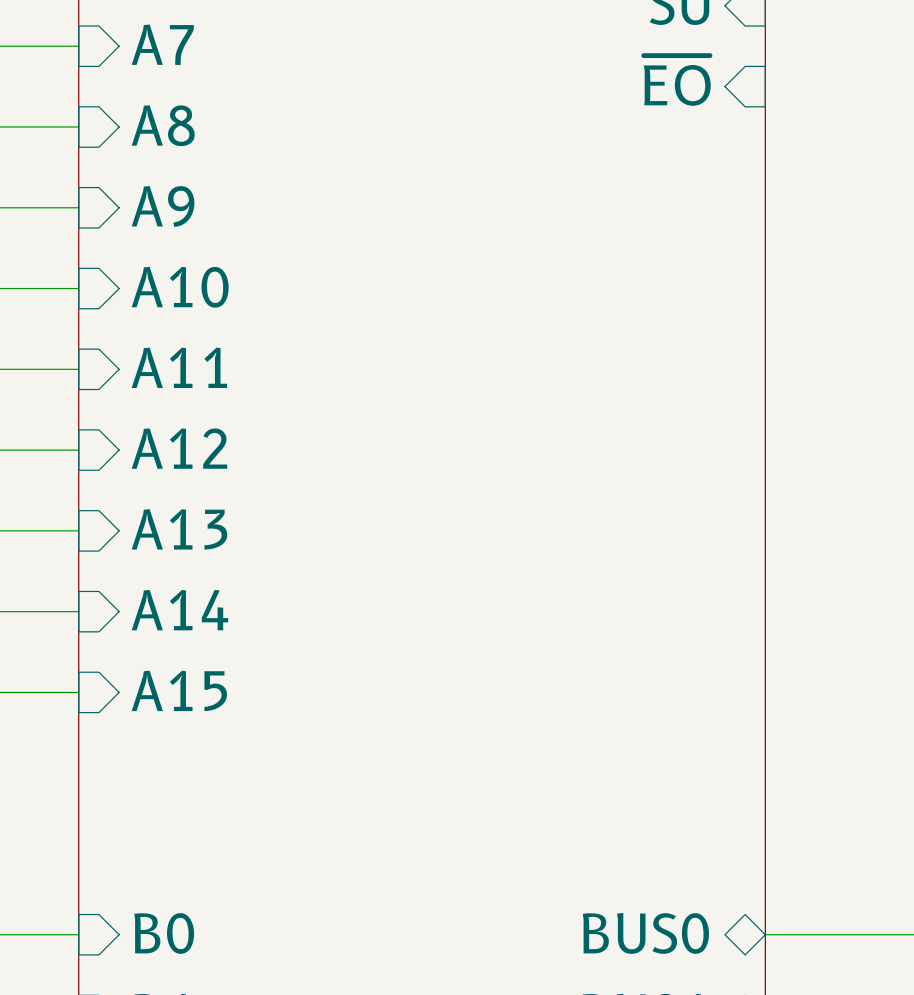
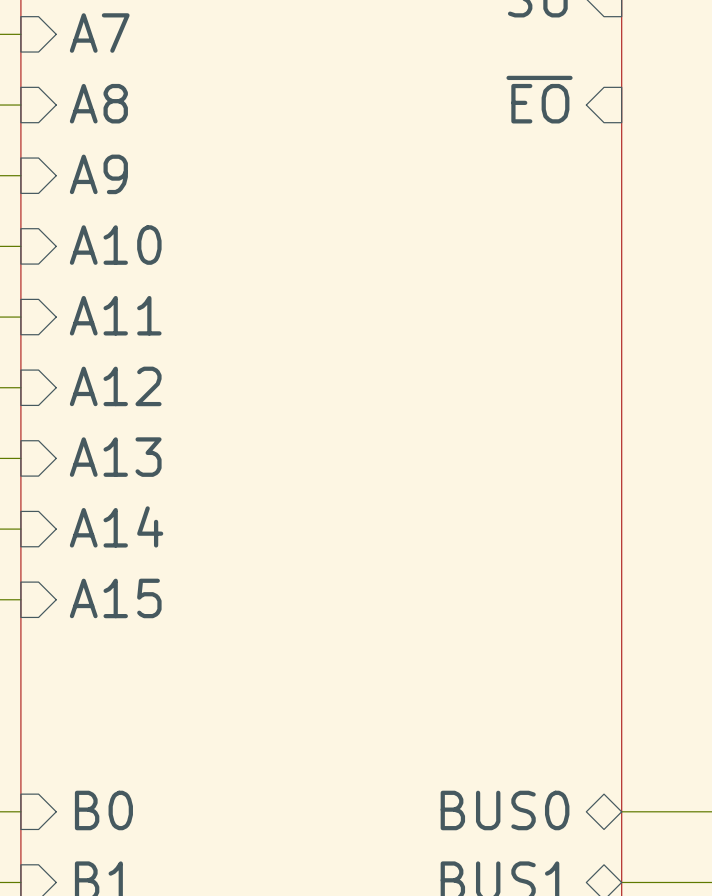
sheet pin position: ~{EO} (677, 80) -> ~{EO} (539, 99)

